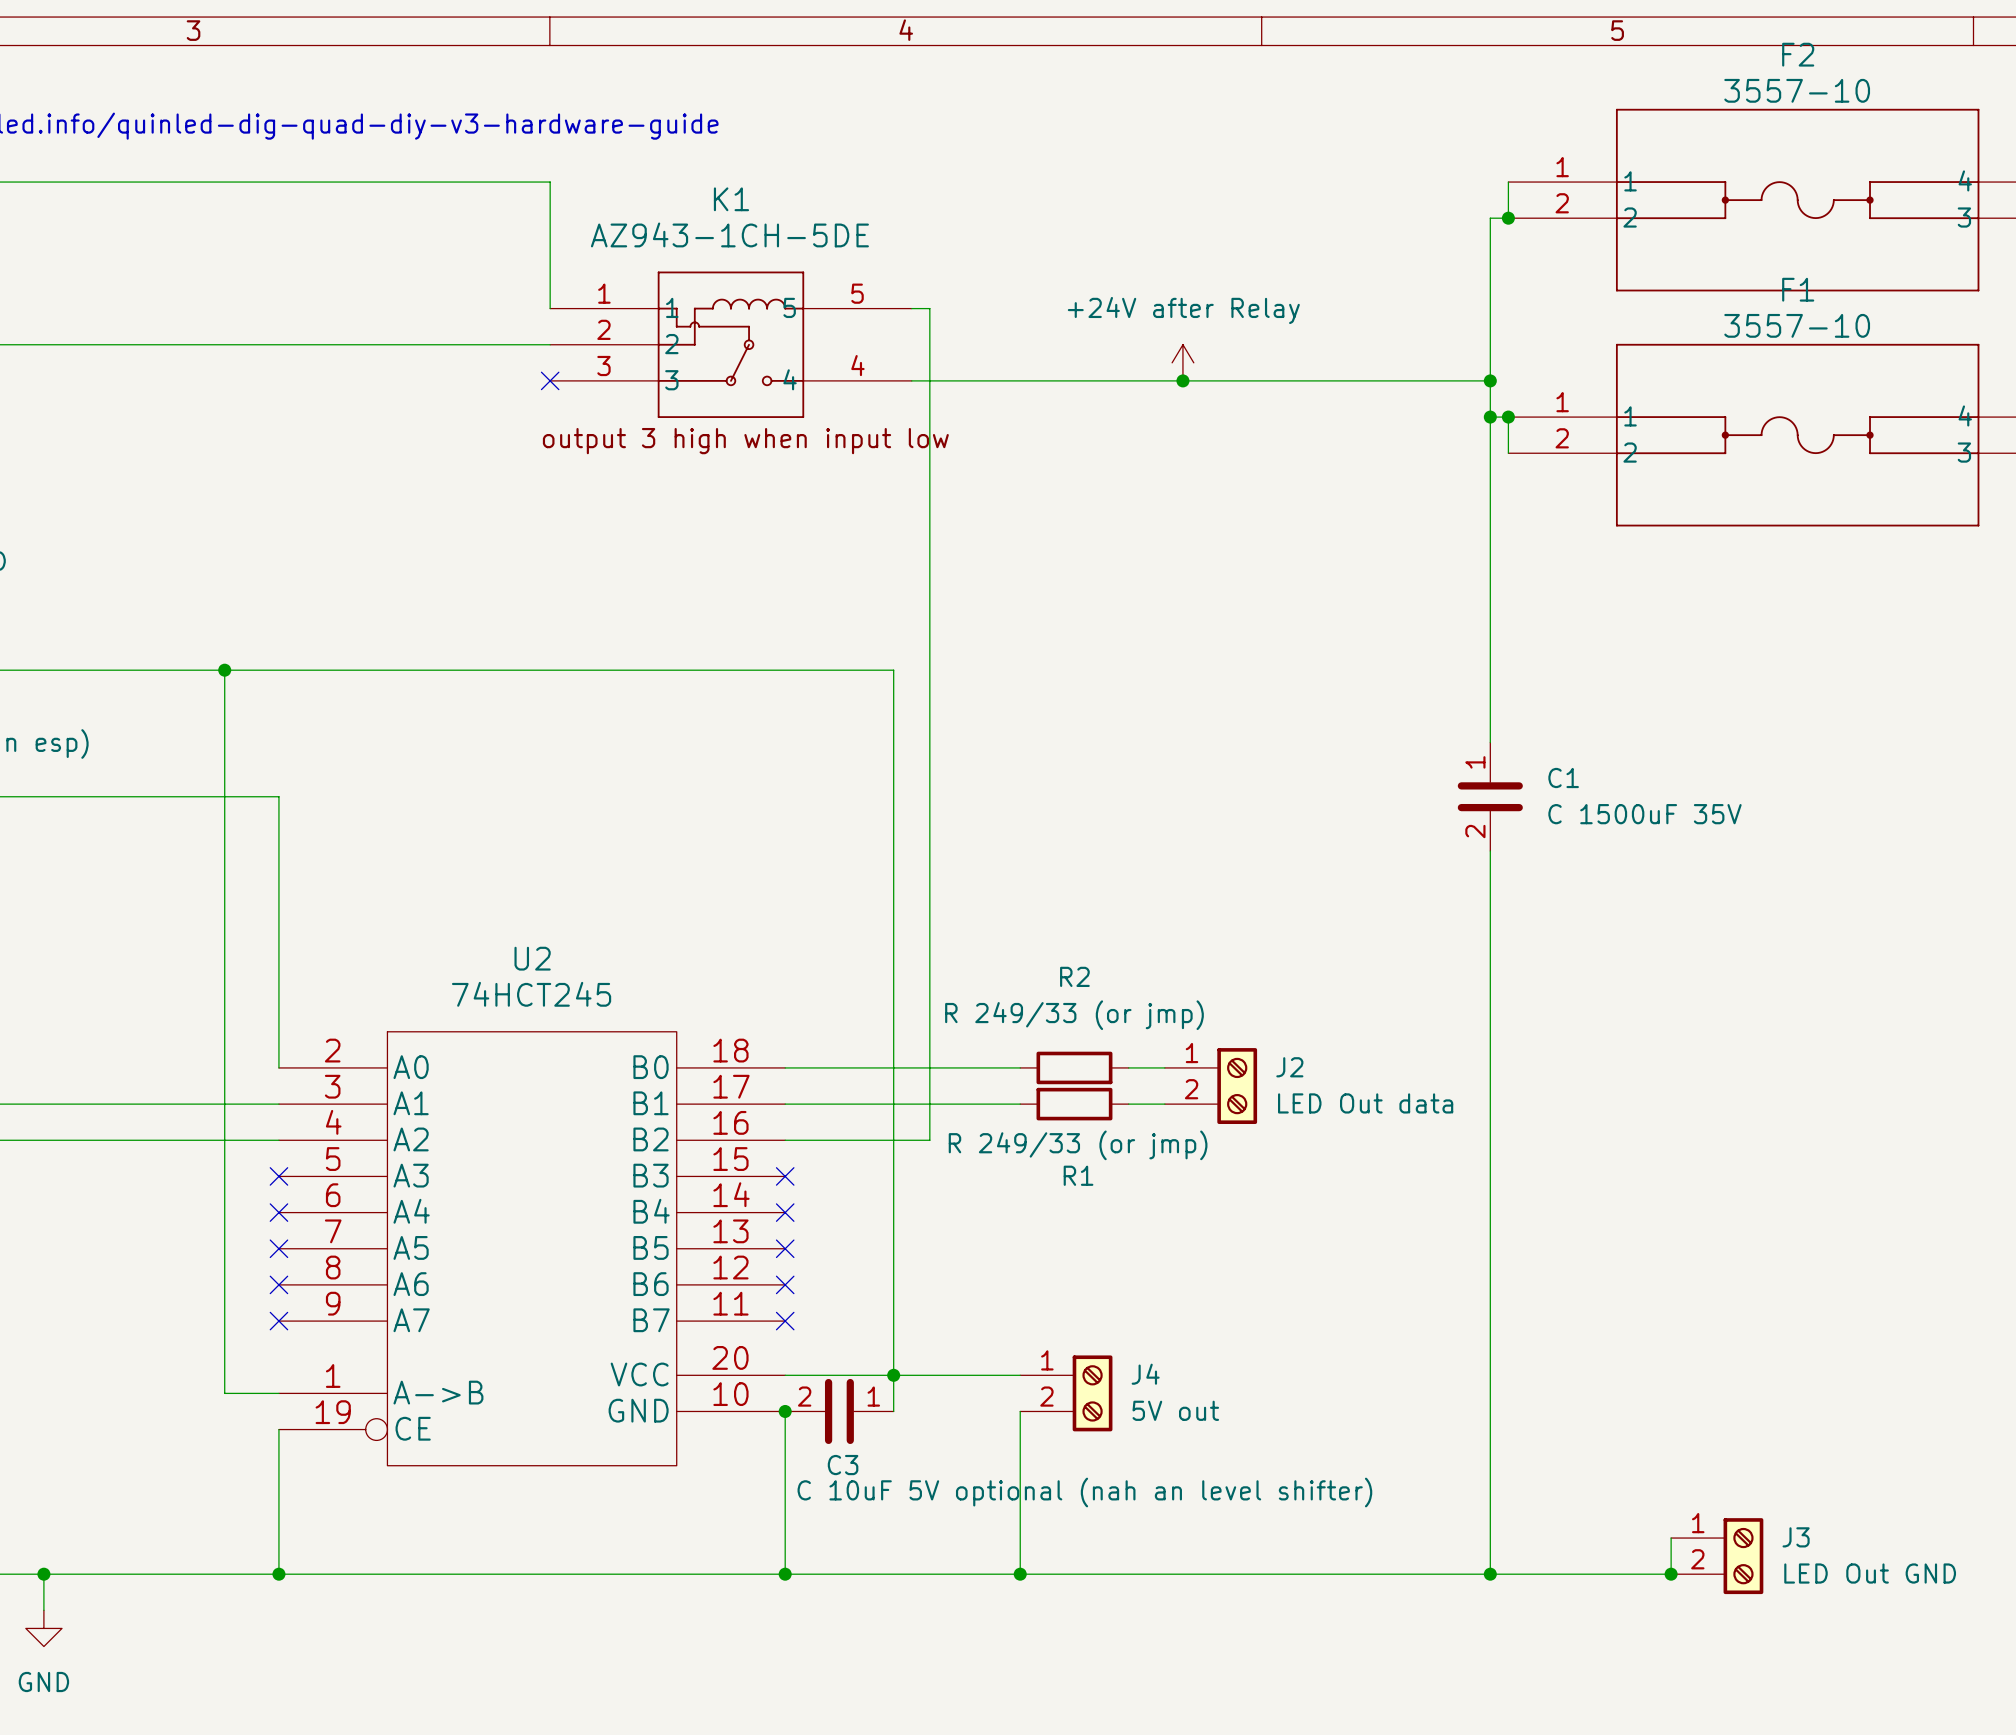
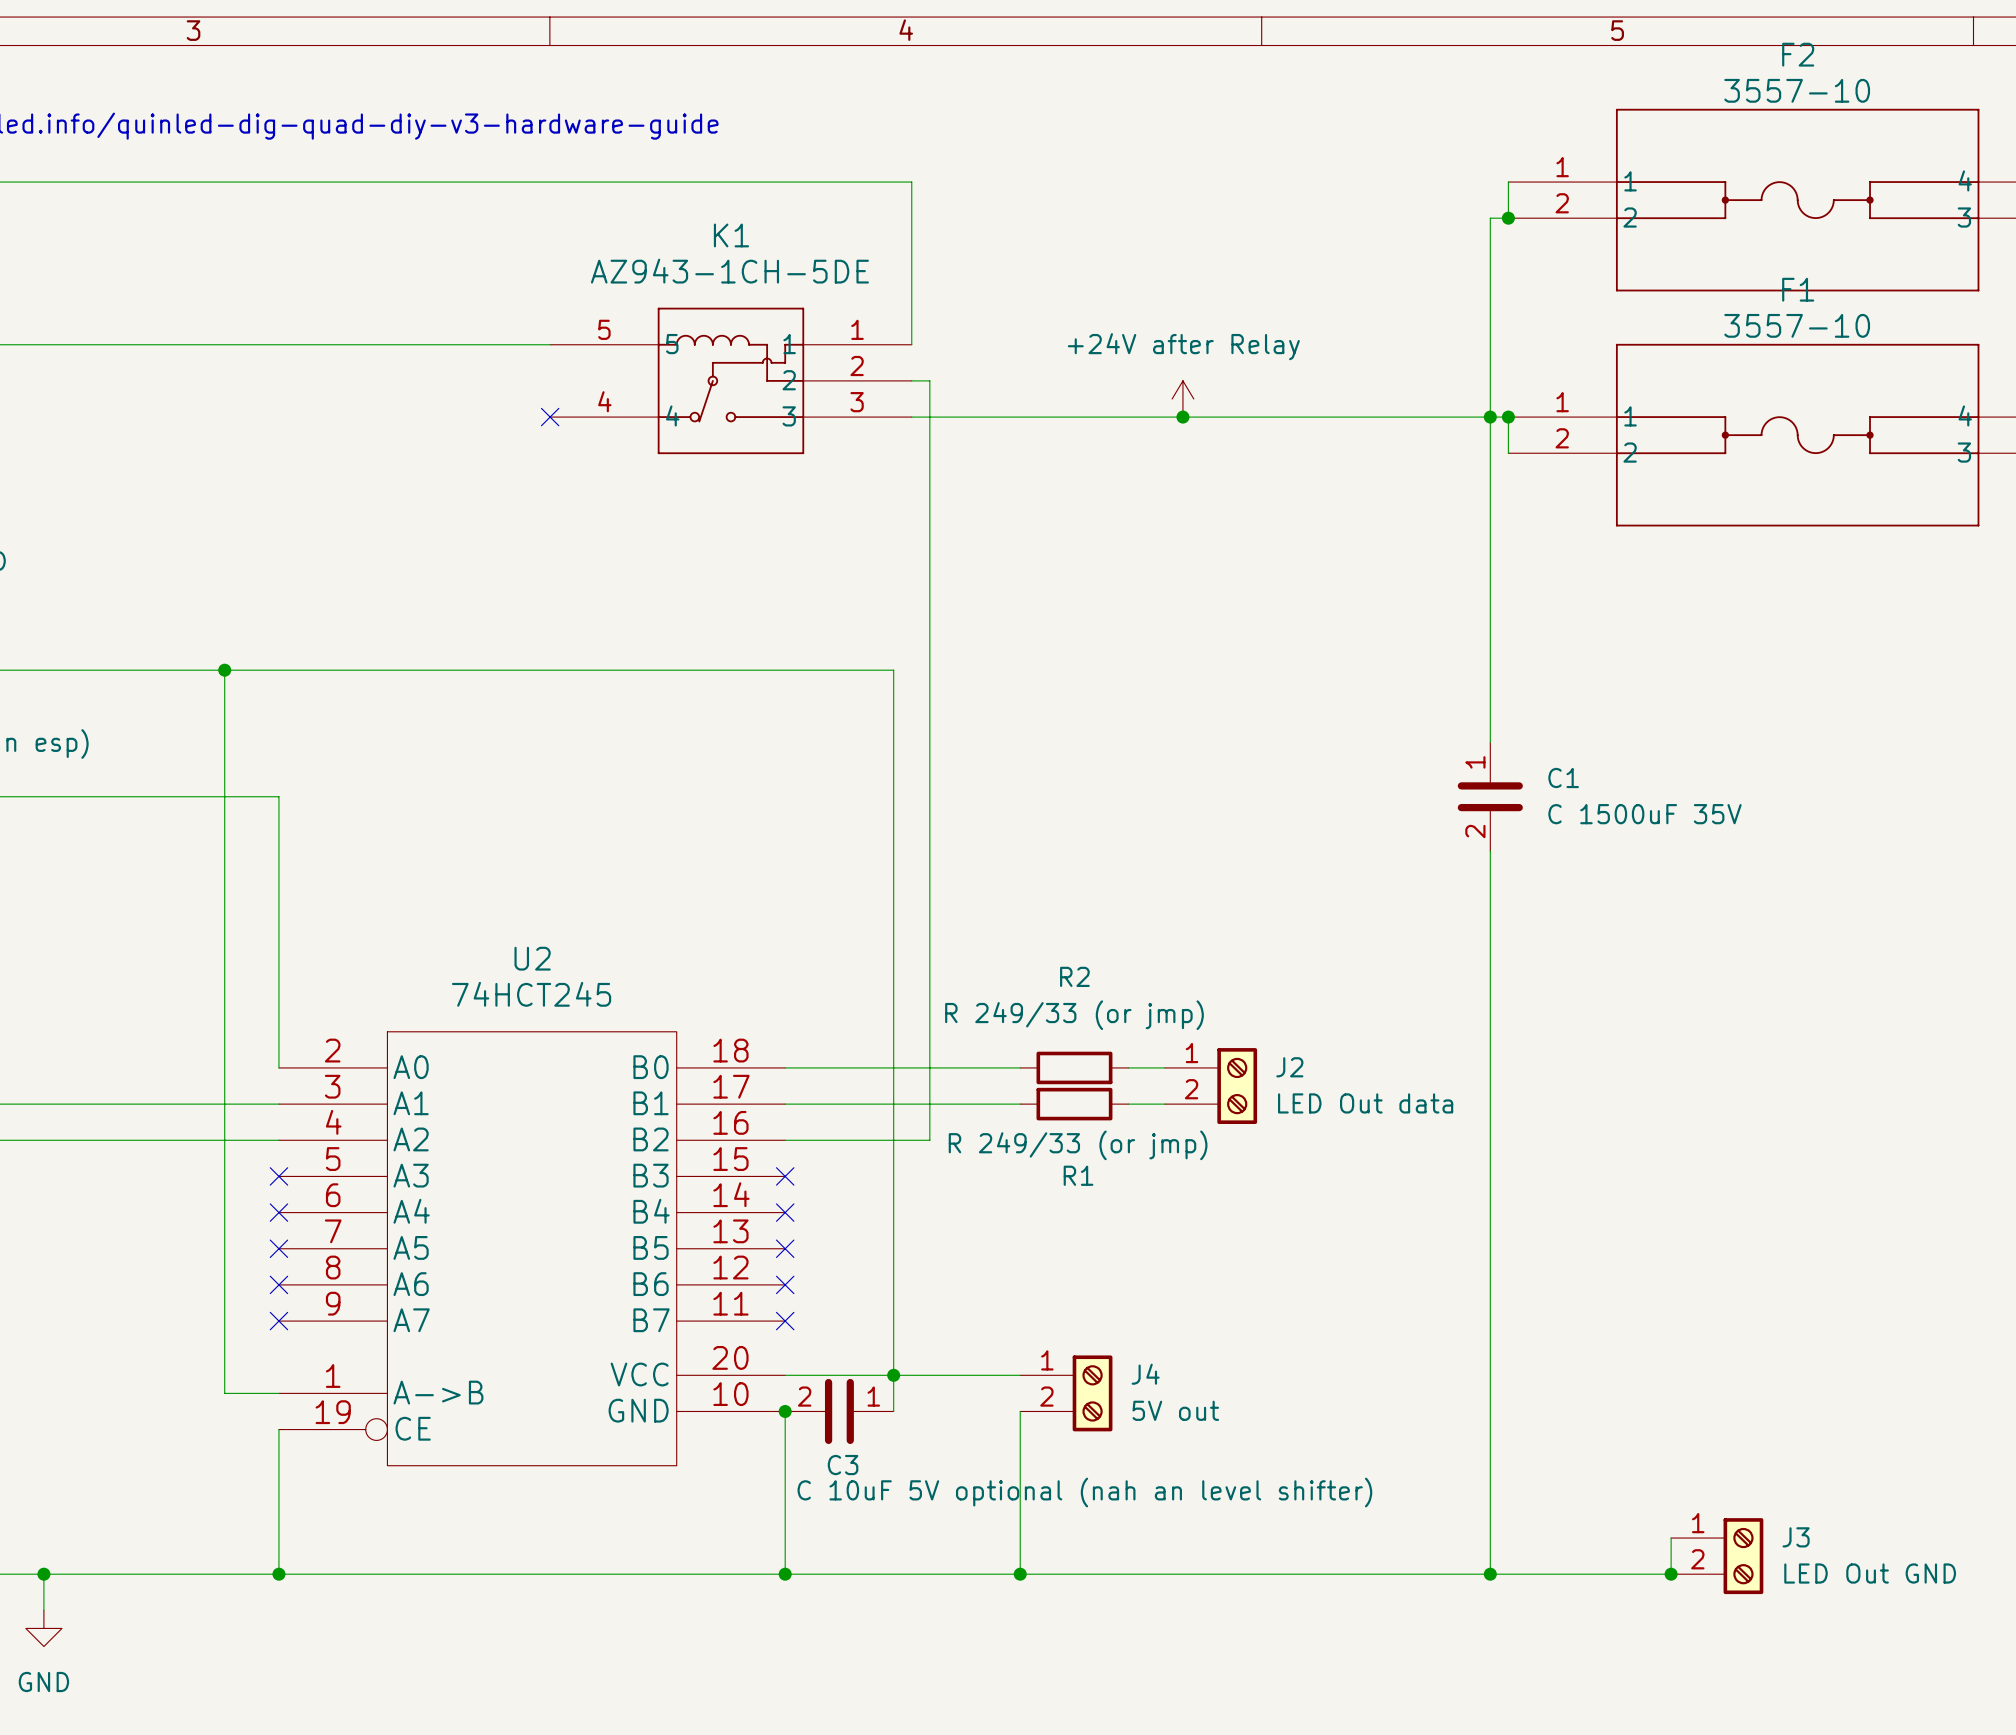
wire: (550, 182) (550, 308) -> (550, 182) (911, 182) (911, 344)
K1 symbol: [550, 271, 912, 418] -> [550, 307, 912, 455]
wire: (911, 308) (929, 308) (929, 380) (1490, 380) -> none
power symbol position: +24V after Relay (1182, 362) -> +24V after Relay (1182, 398)
no-connect mark position: (550, 380) -> (550, 417)
junction position: (1182, 380) -> (1182, 417)
junction: (1490, 380) -> none
wire: none -> (911, 417) (1490, 417)

